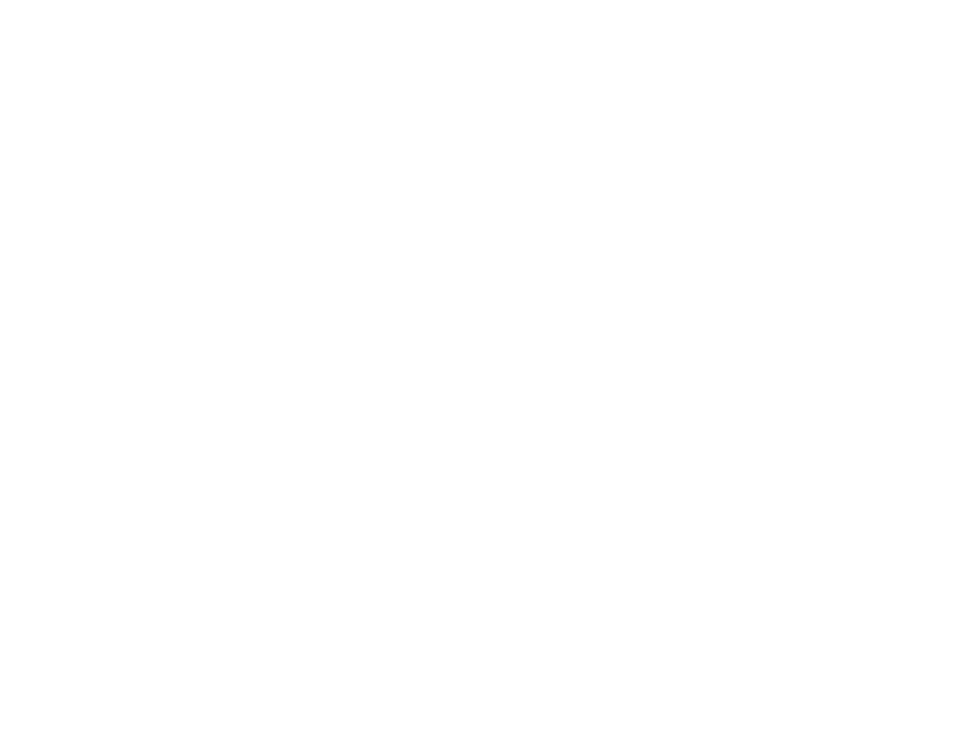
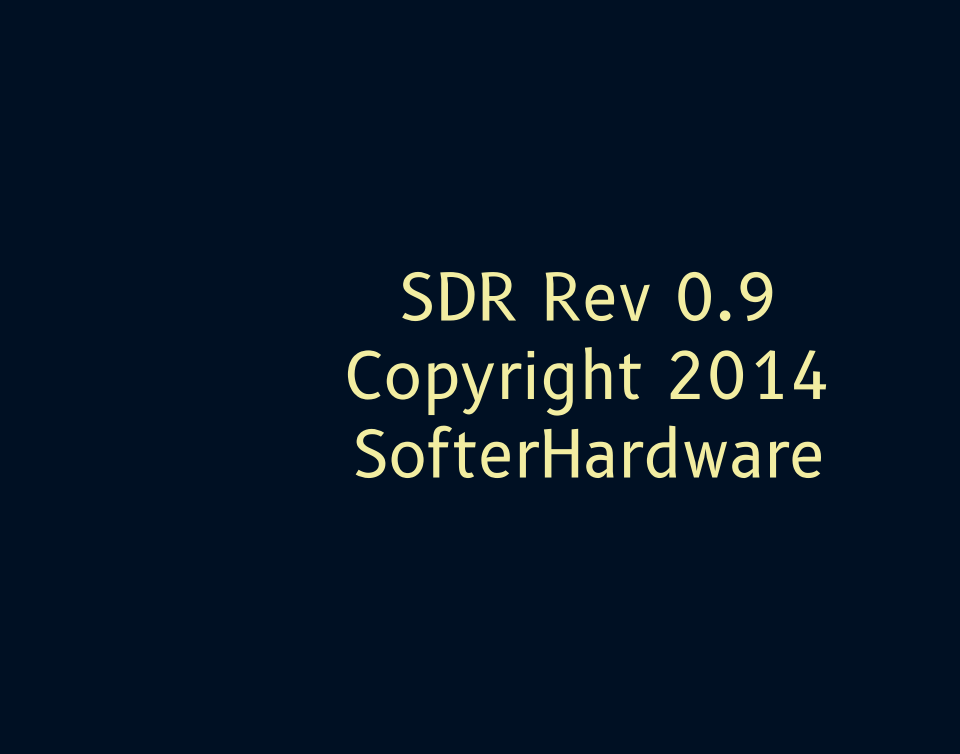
text: none -> SDR Rev 0.9 (587, 296)
text: none -> Copyright 2014 (587, 381)
text: none -> SofterHardware (588, 451)

